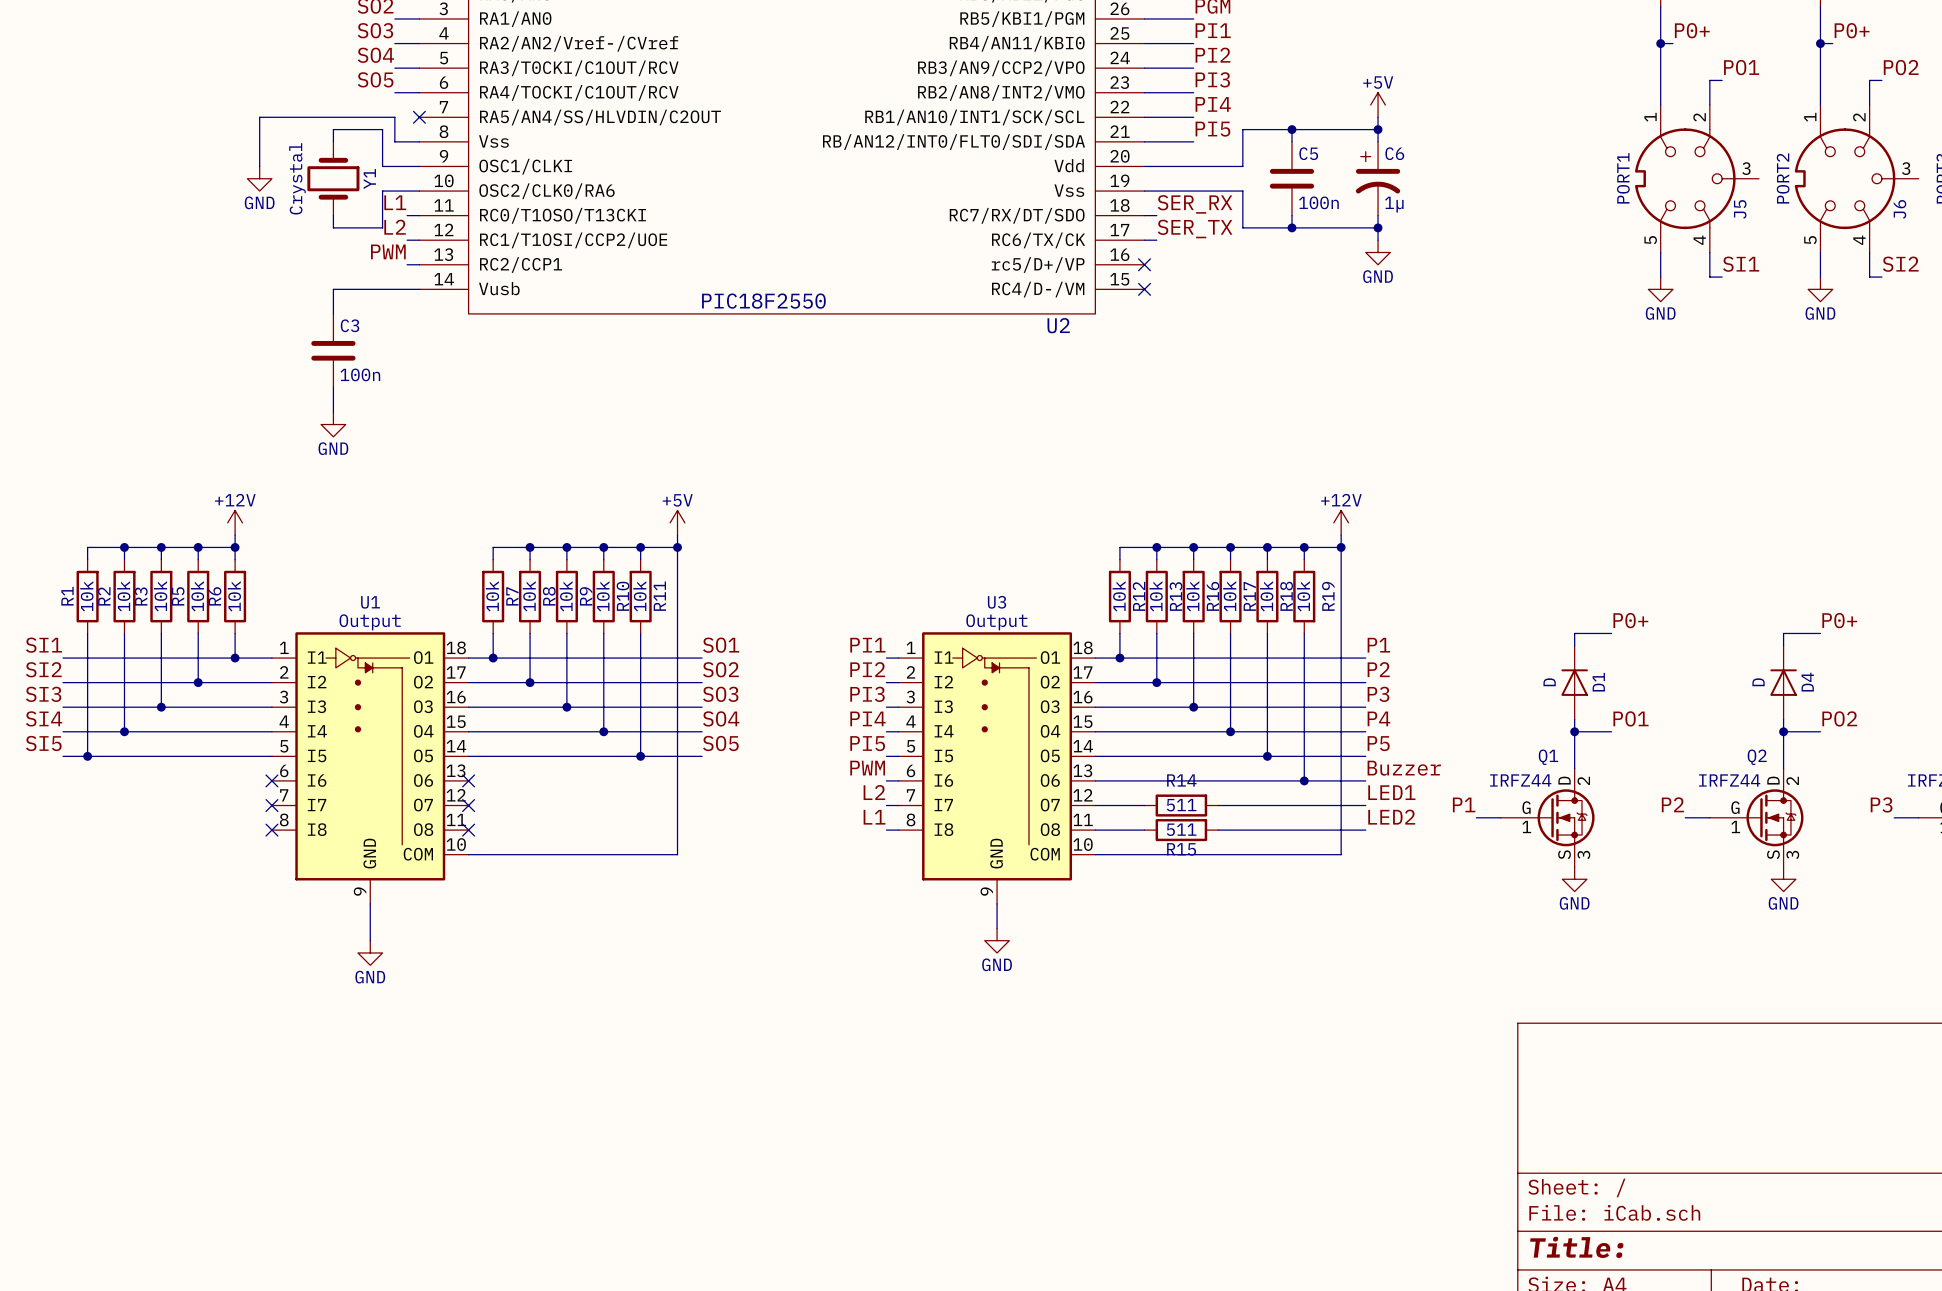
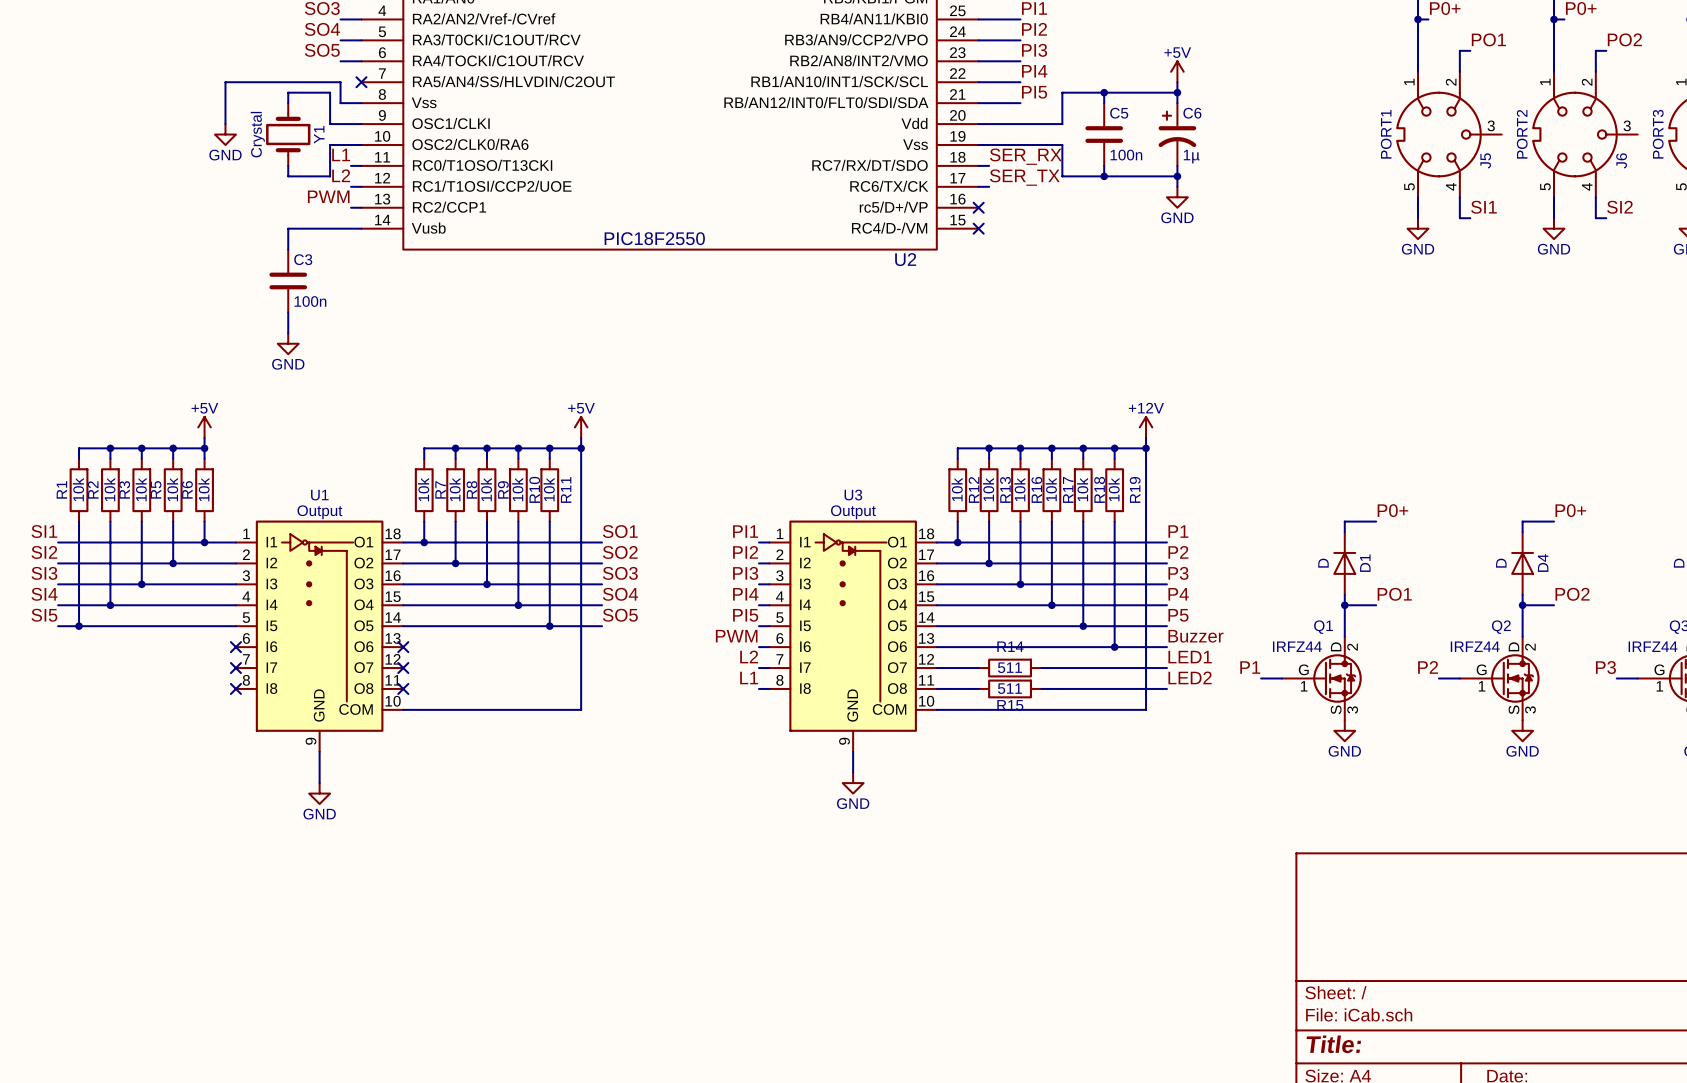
power symbol: +12V (235, 522) -> +5V (204, 427)

